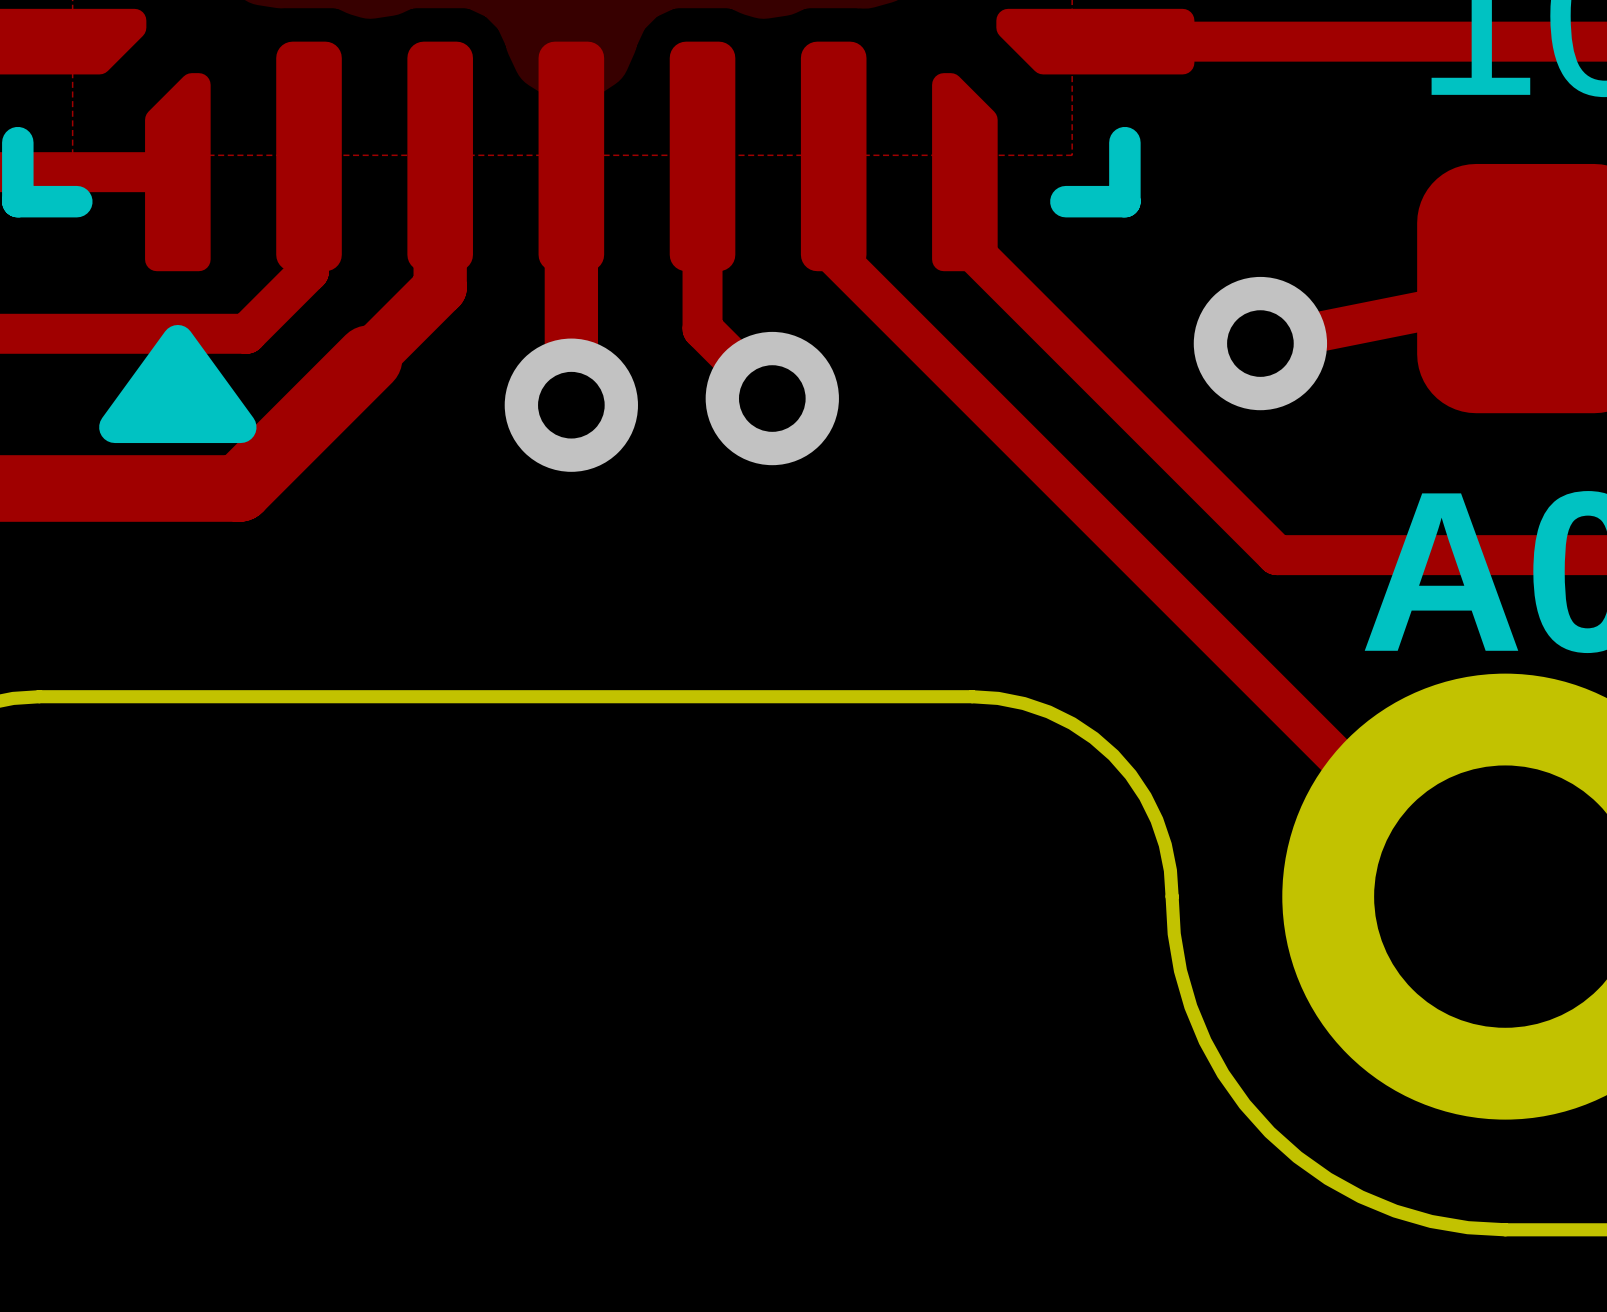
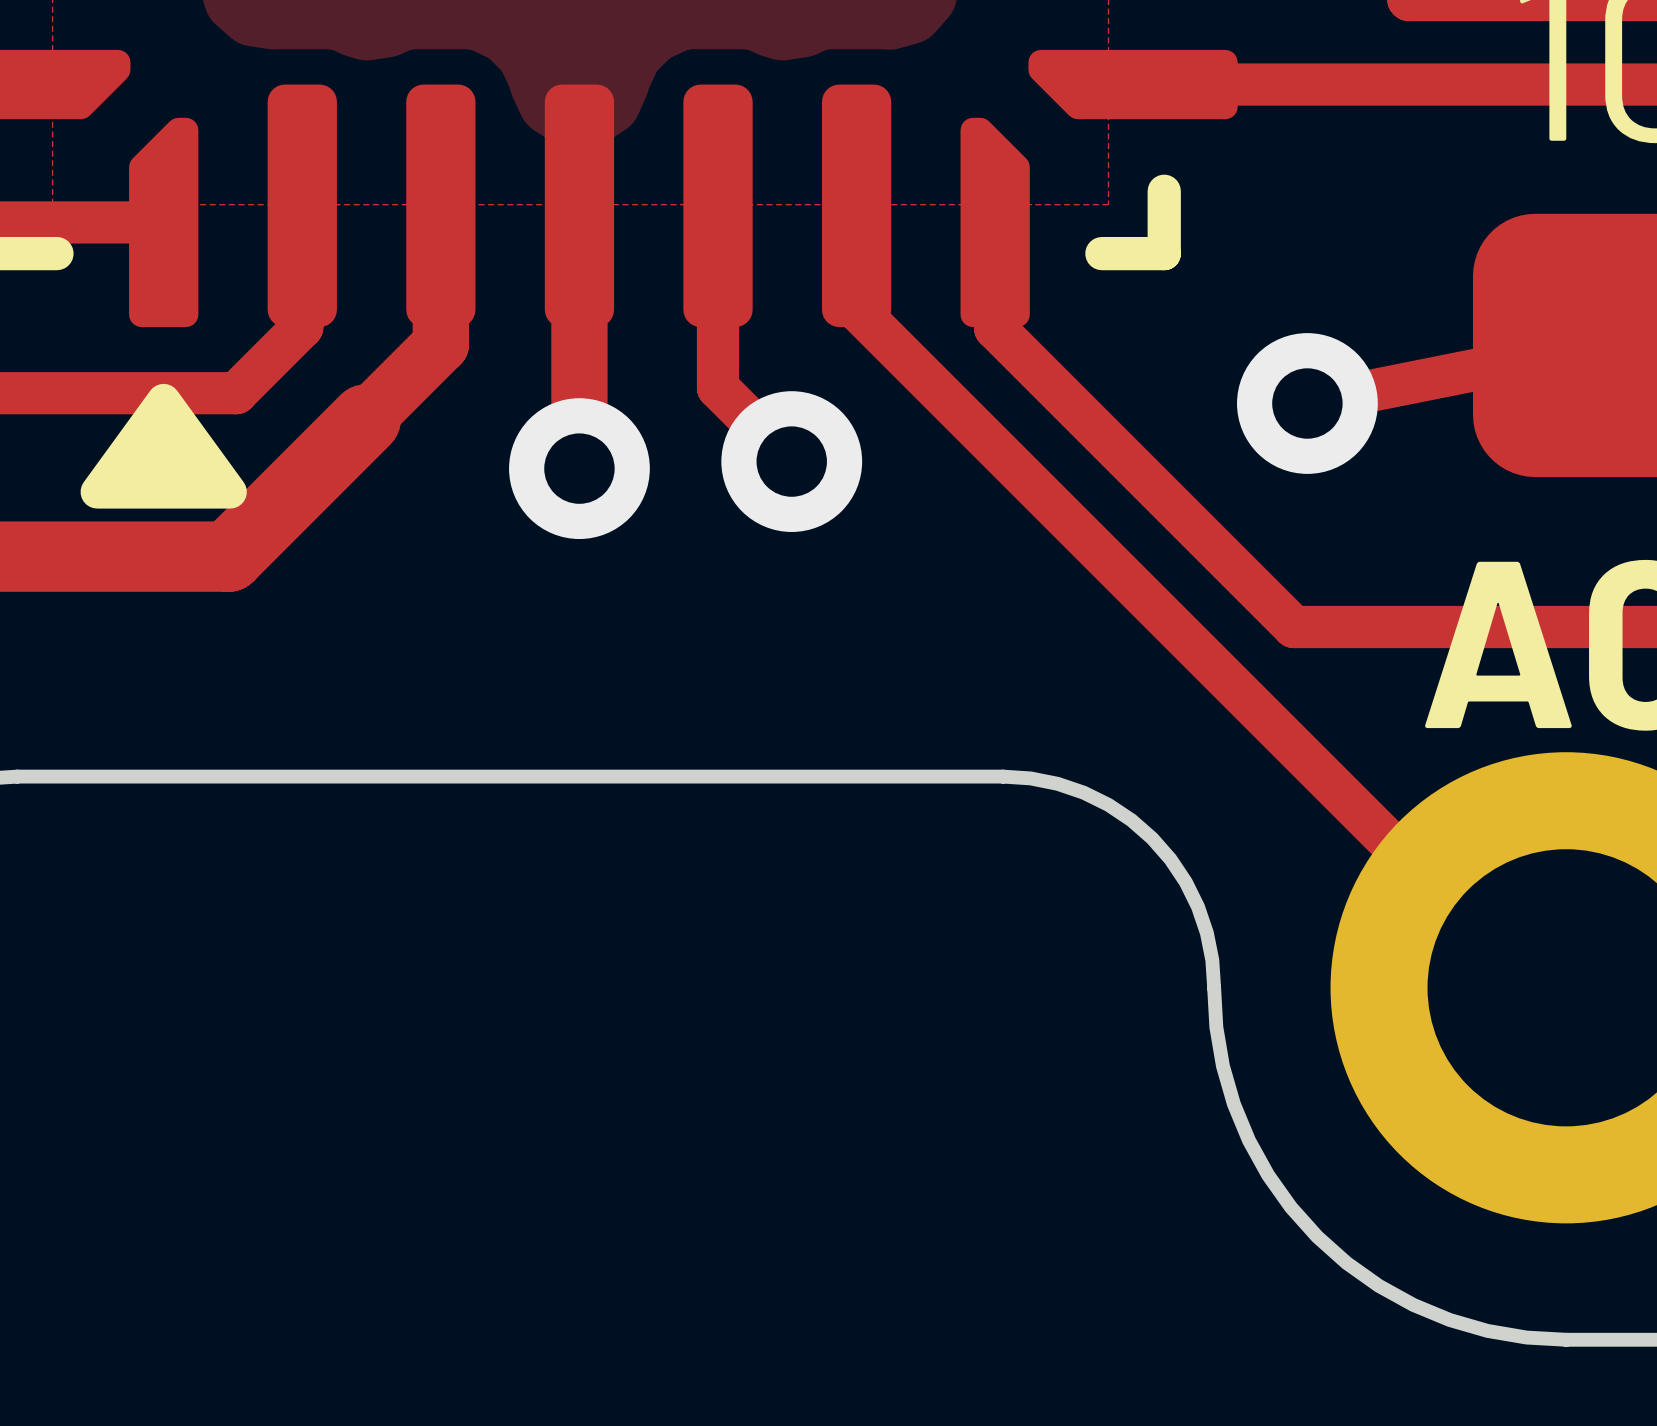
track: (964, 243) (1276, 555) -> (995, 297) (995, 328) (1293, 627) (1324, 627)

